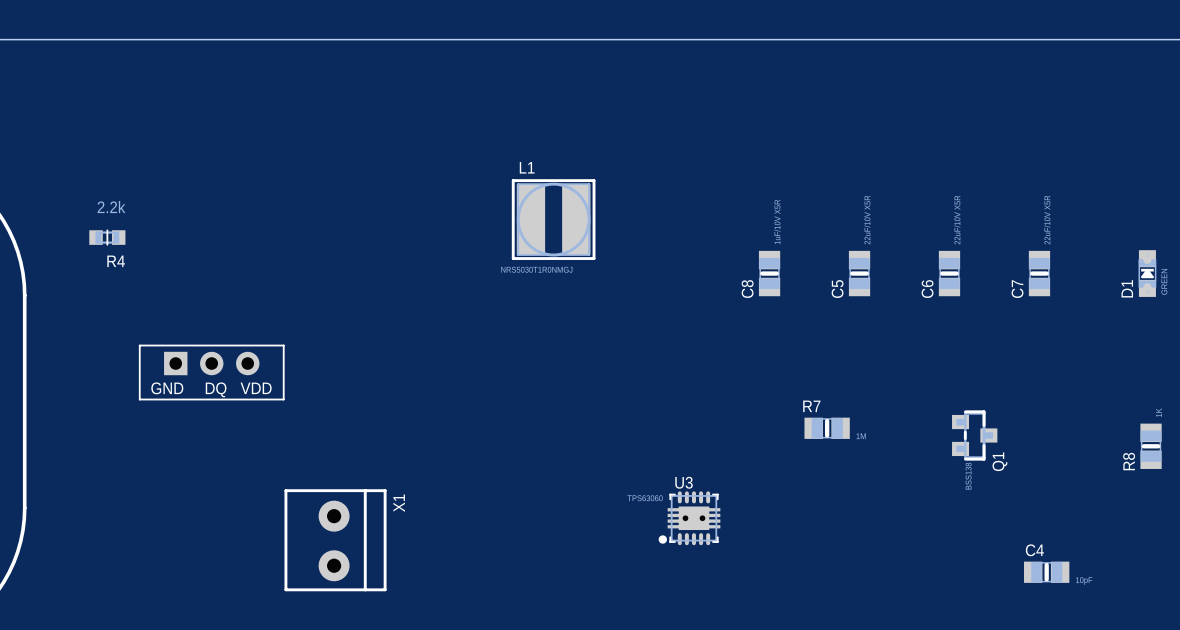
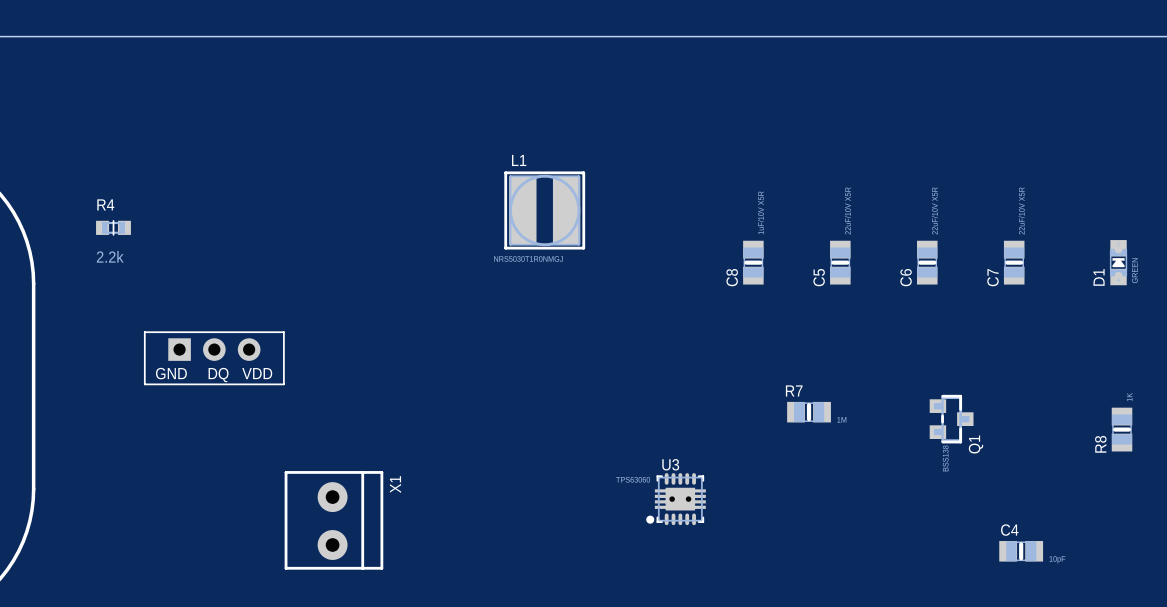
R4 value position: 2.2k (111, 207) -> 2.2k (110, 256)
R4 name position: R4 (116, 261) -> R4 (105, 204)

